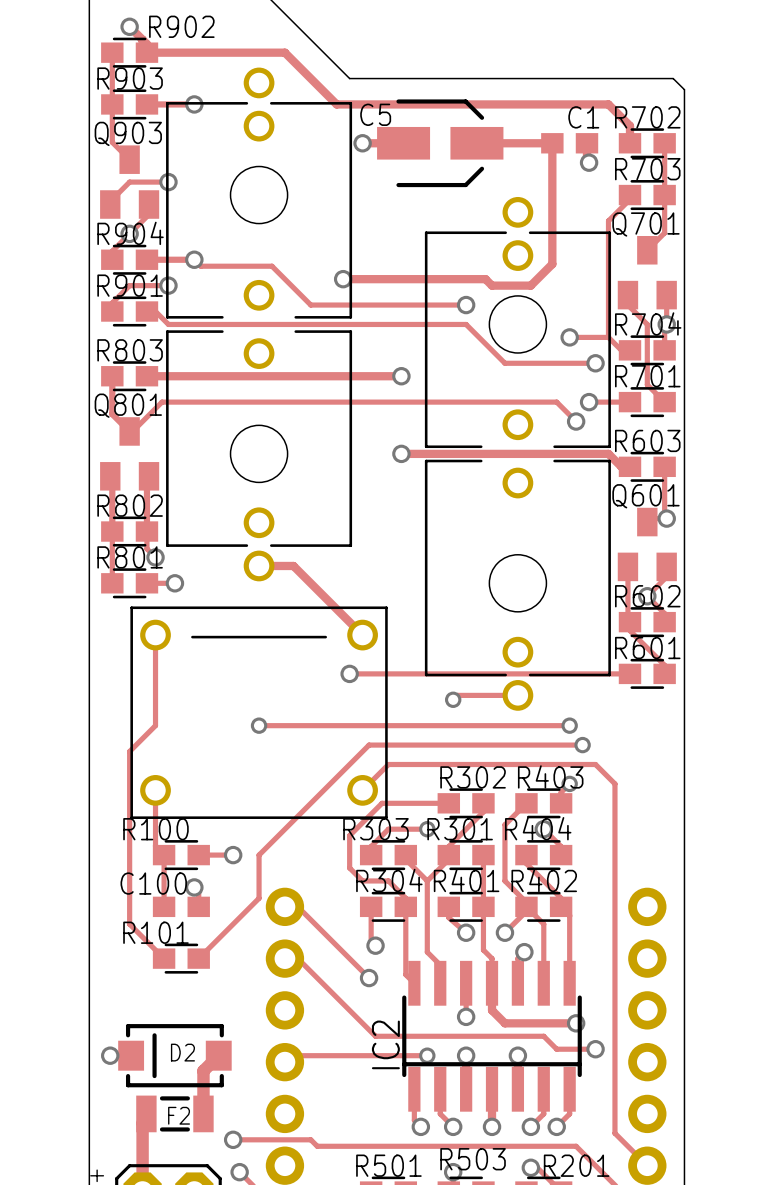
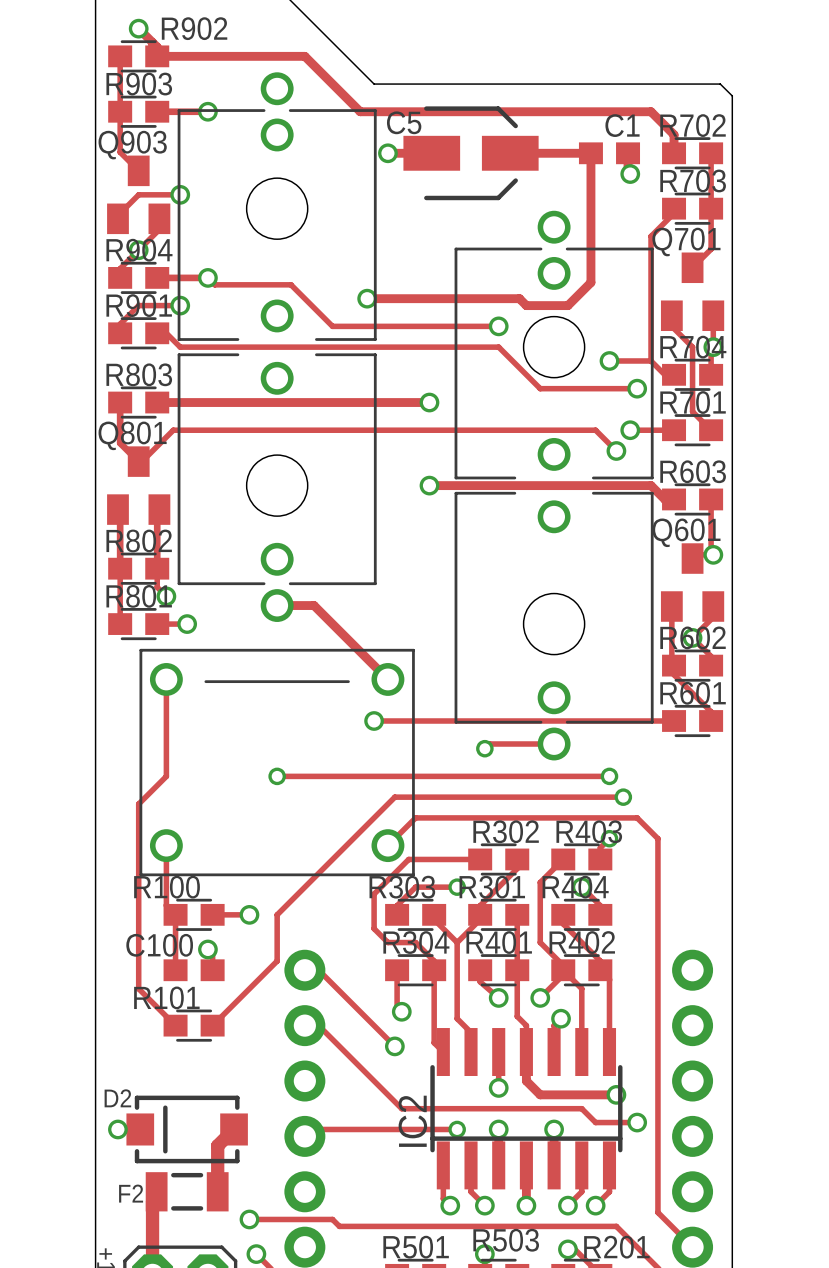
D2 name position: D2 (182, 1052) -> D2 (117, 1098)
F2 name position: F2 (179, 1115) -> F2 (131, 1193)

